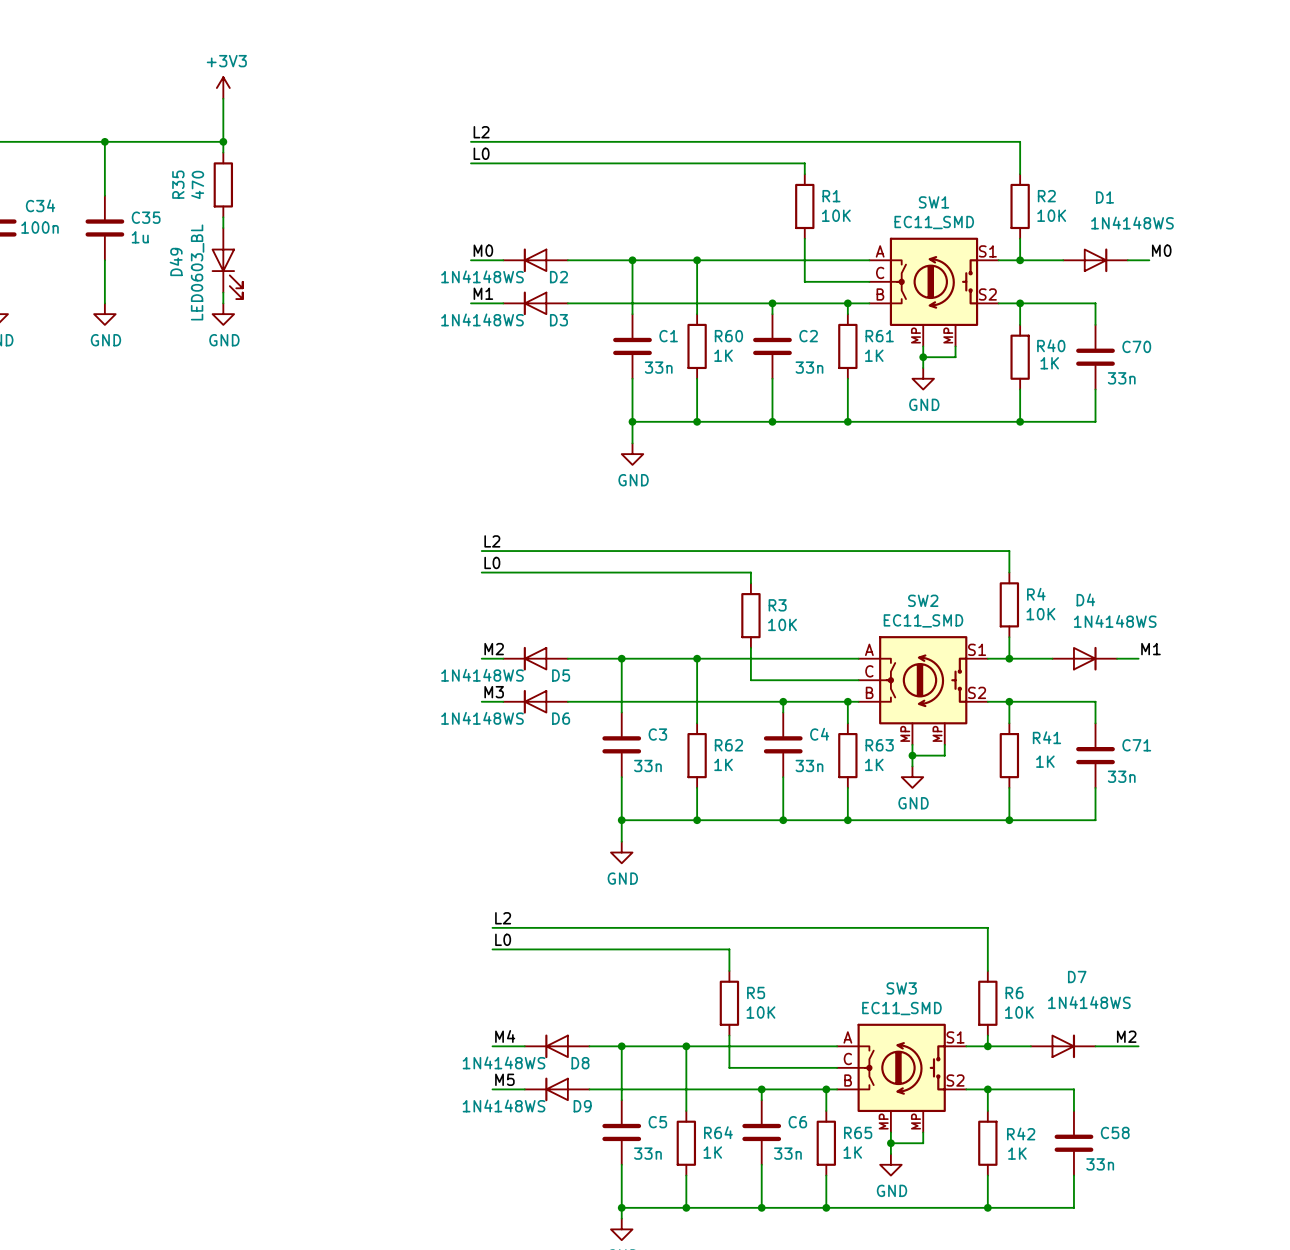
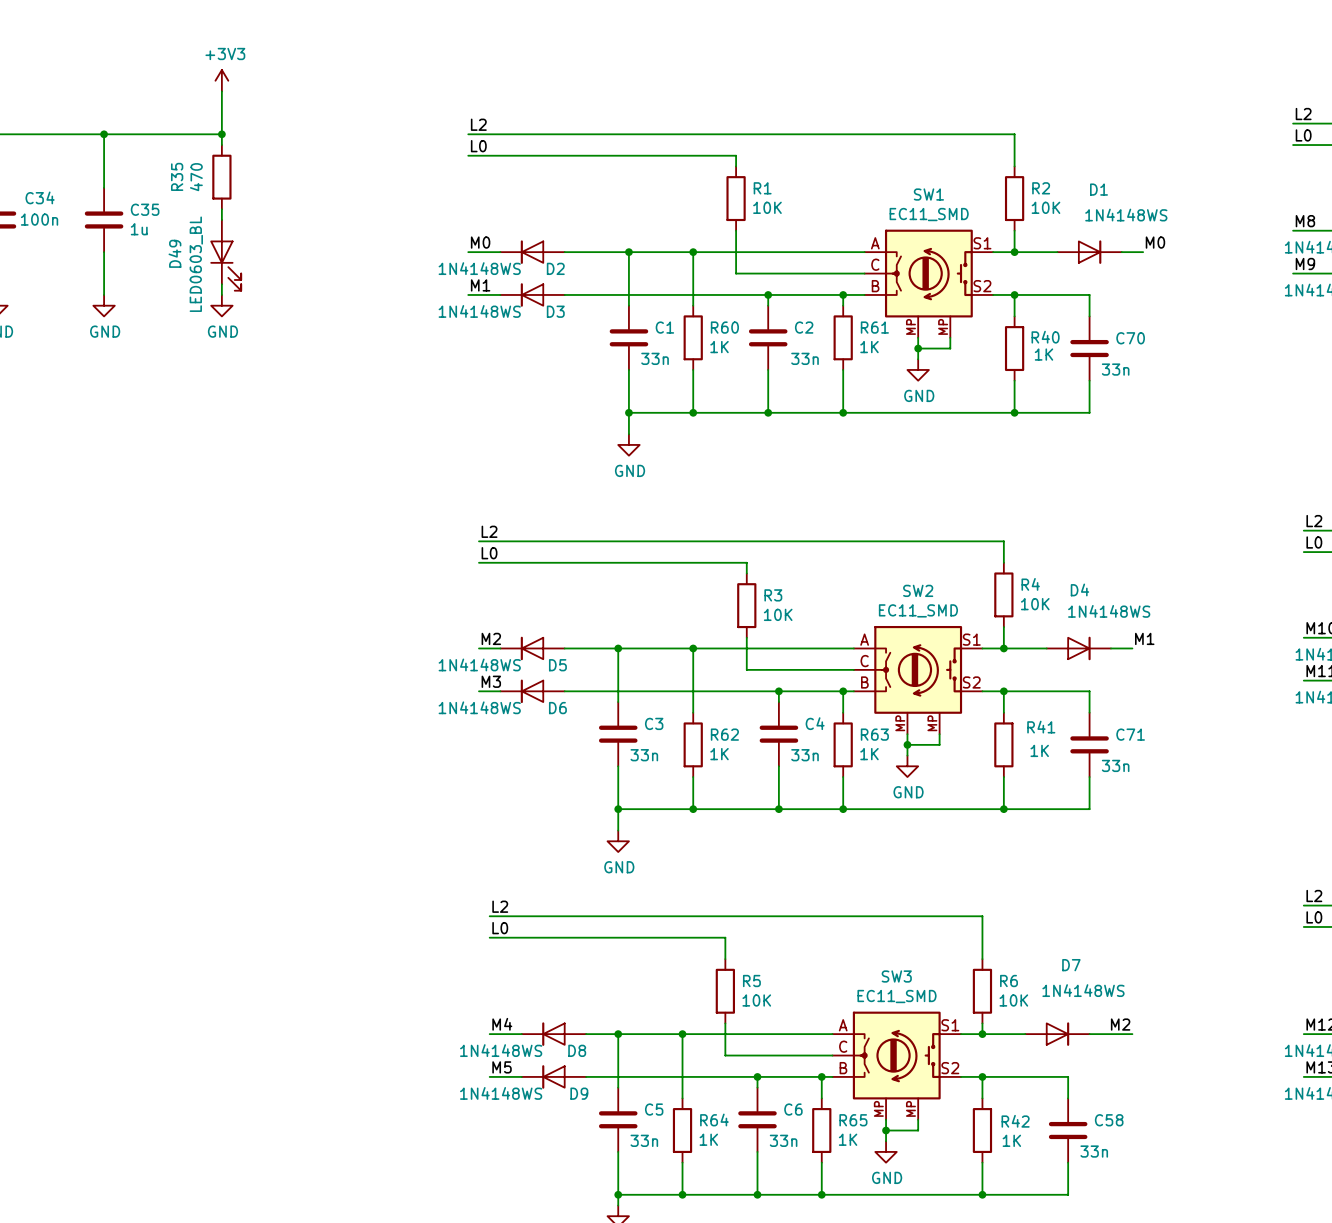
wire: (740, 163) (804, 163) (804, 174) -> (736, 155) (736, 166)
R1 position: (804, 206) -> (736, 198)
wire: (804, 238) (804, 281) -> (736, 230) (736, 273) (800, 273)

